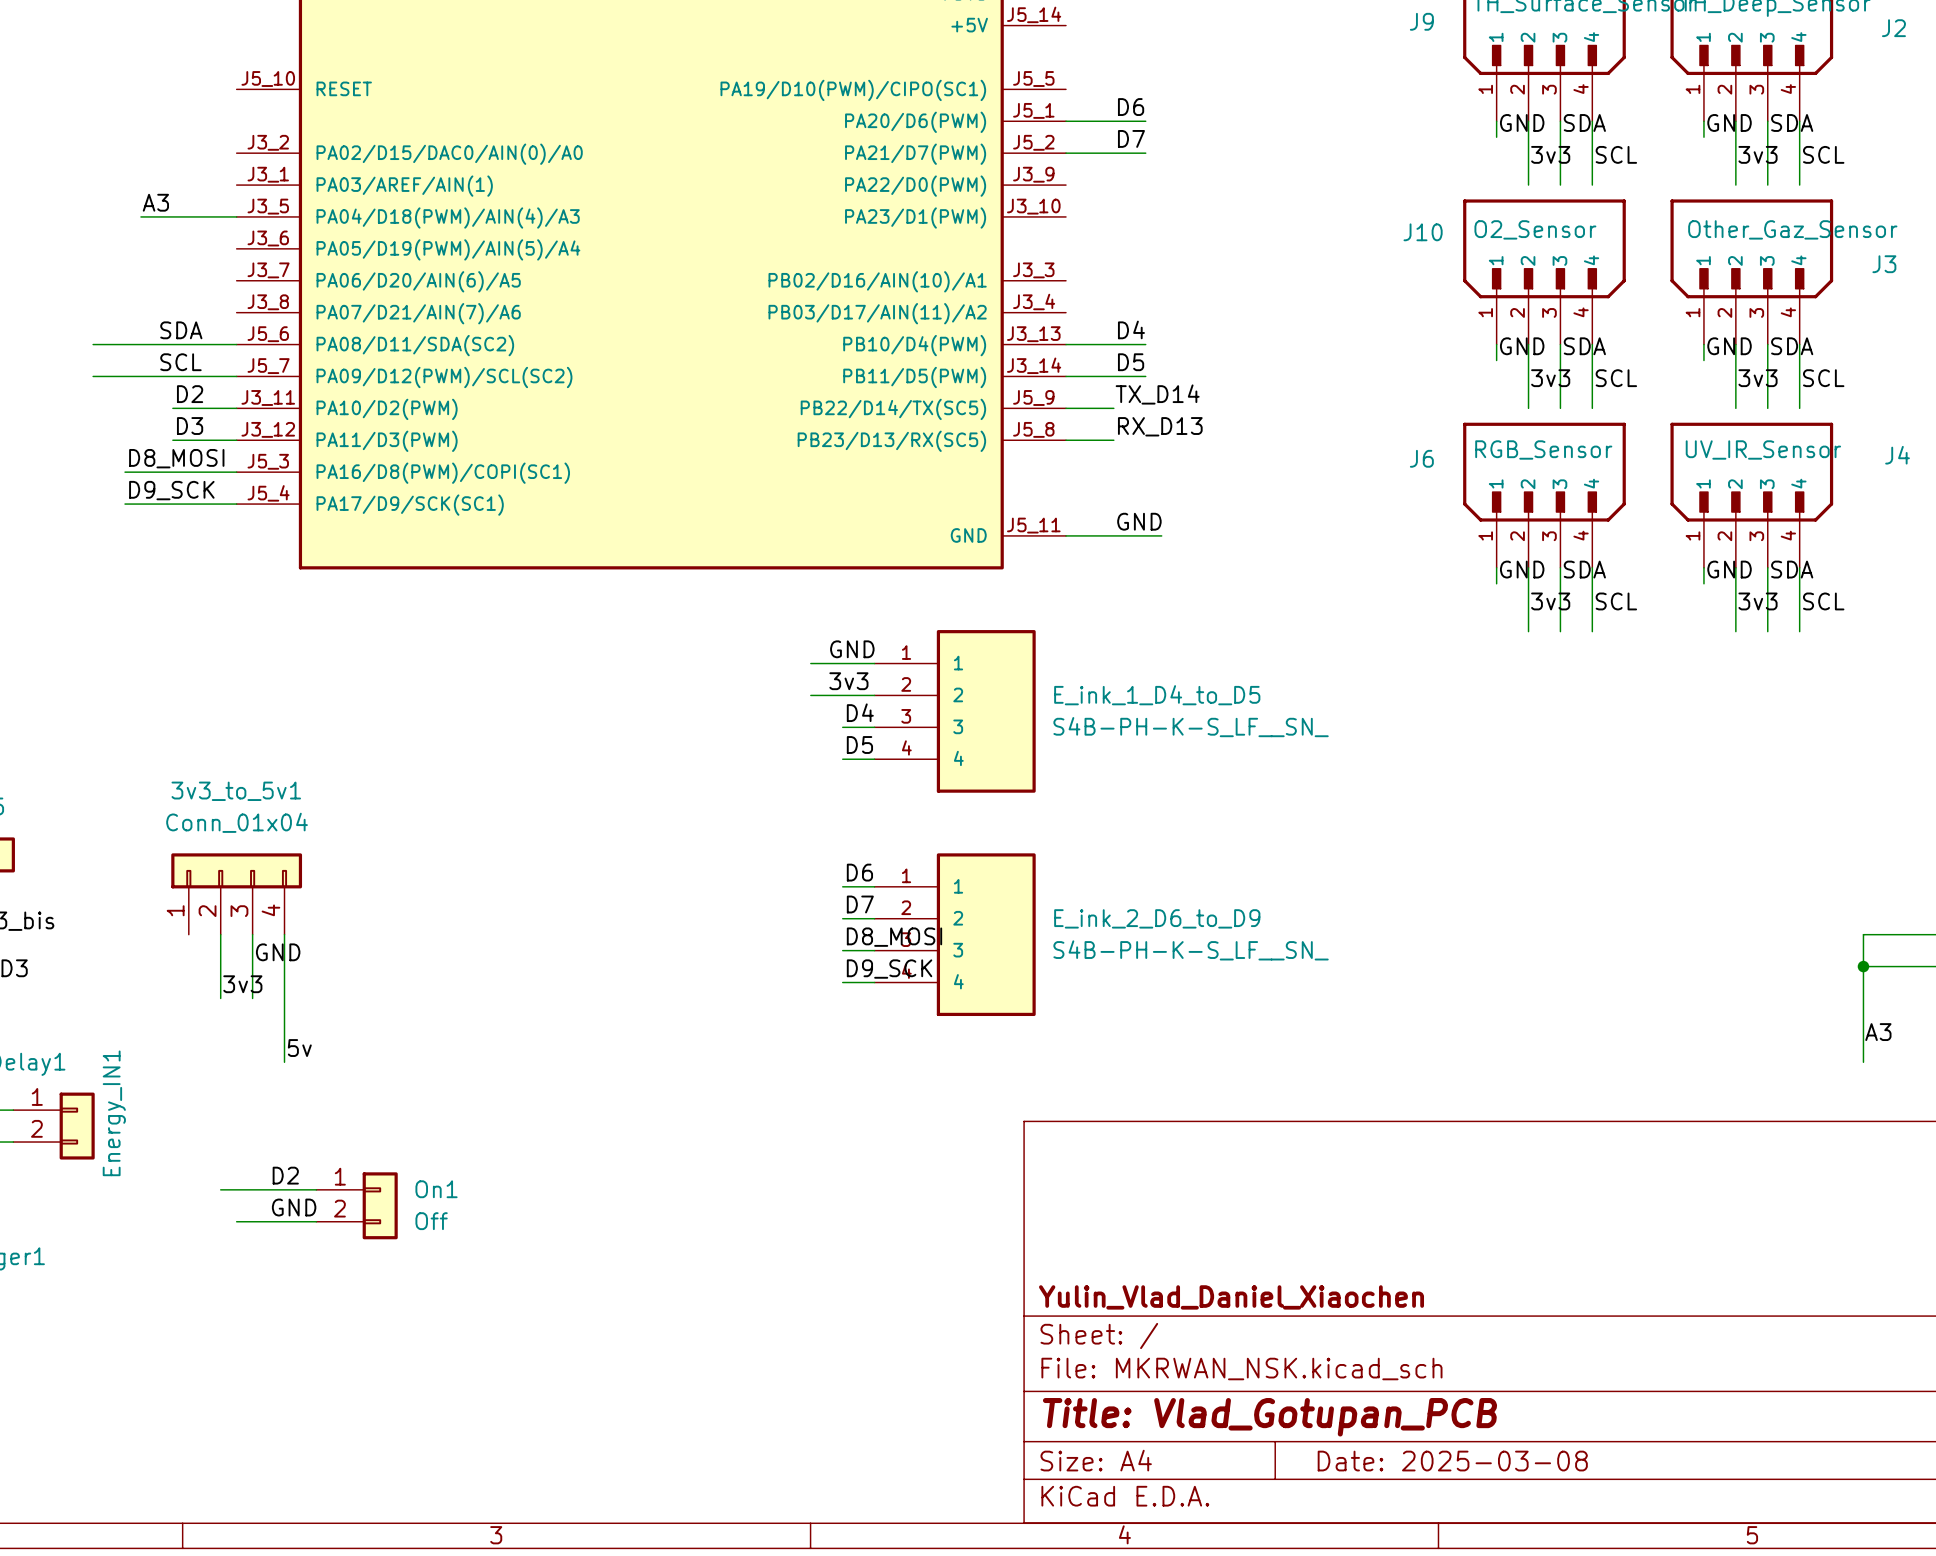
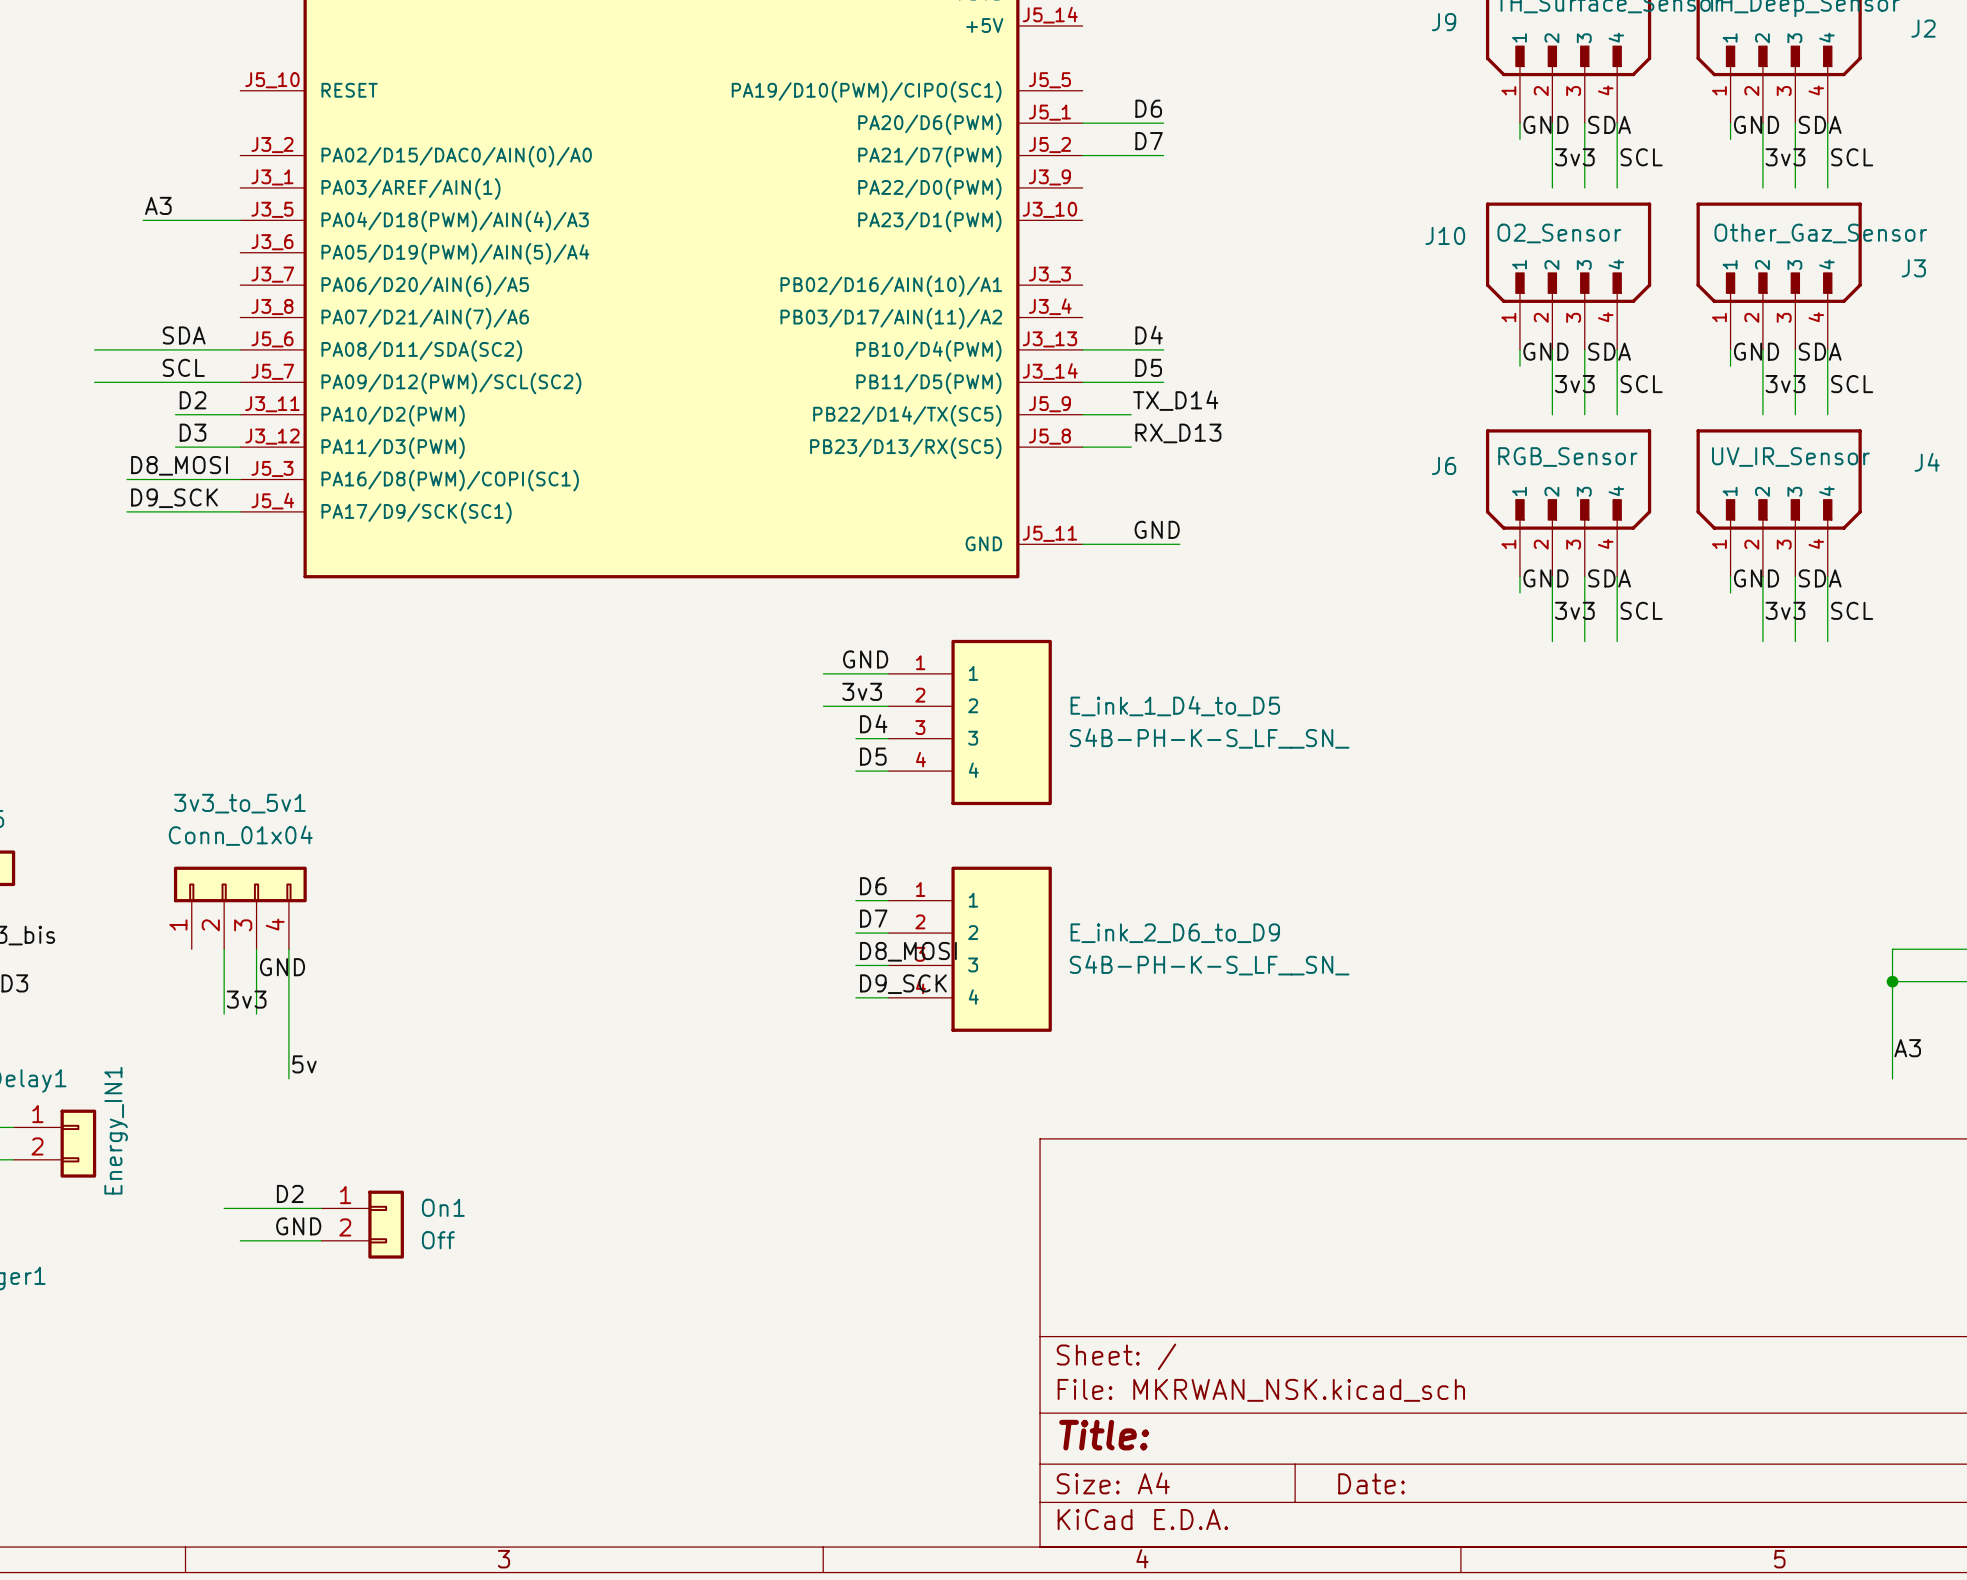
title block: Yulin_Vlad_Daniel_Xiaochen (1231, 1297) -> none
title block: Title: Vlad_Gotupan_PCB (1270, 1417) -> Title: (1104, 1435)
title block: Date: 2025-03-08 (1452, 1461) -> Date: (1371, 1483)

